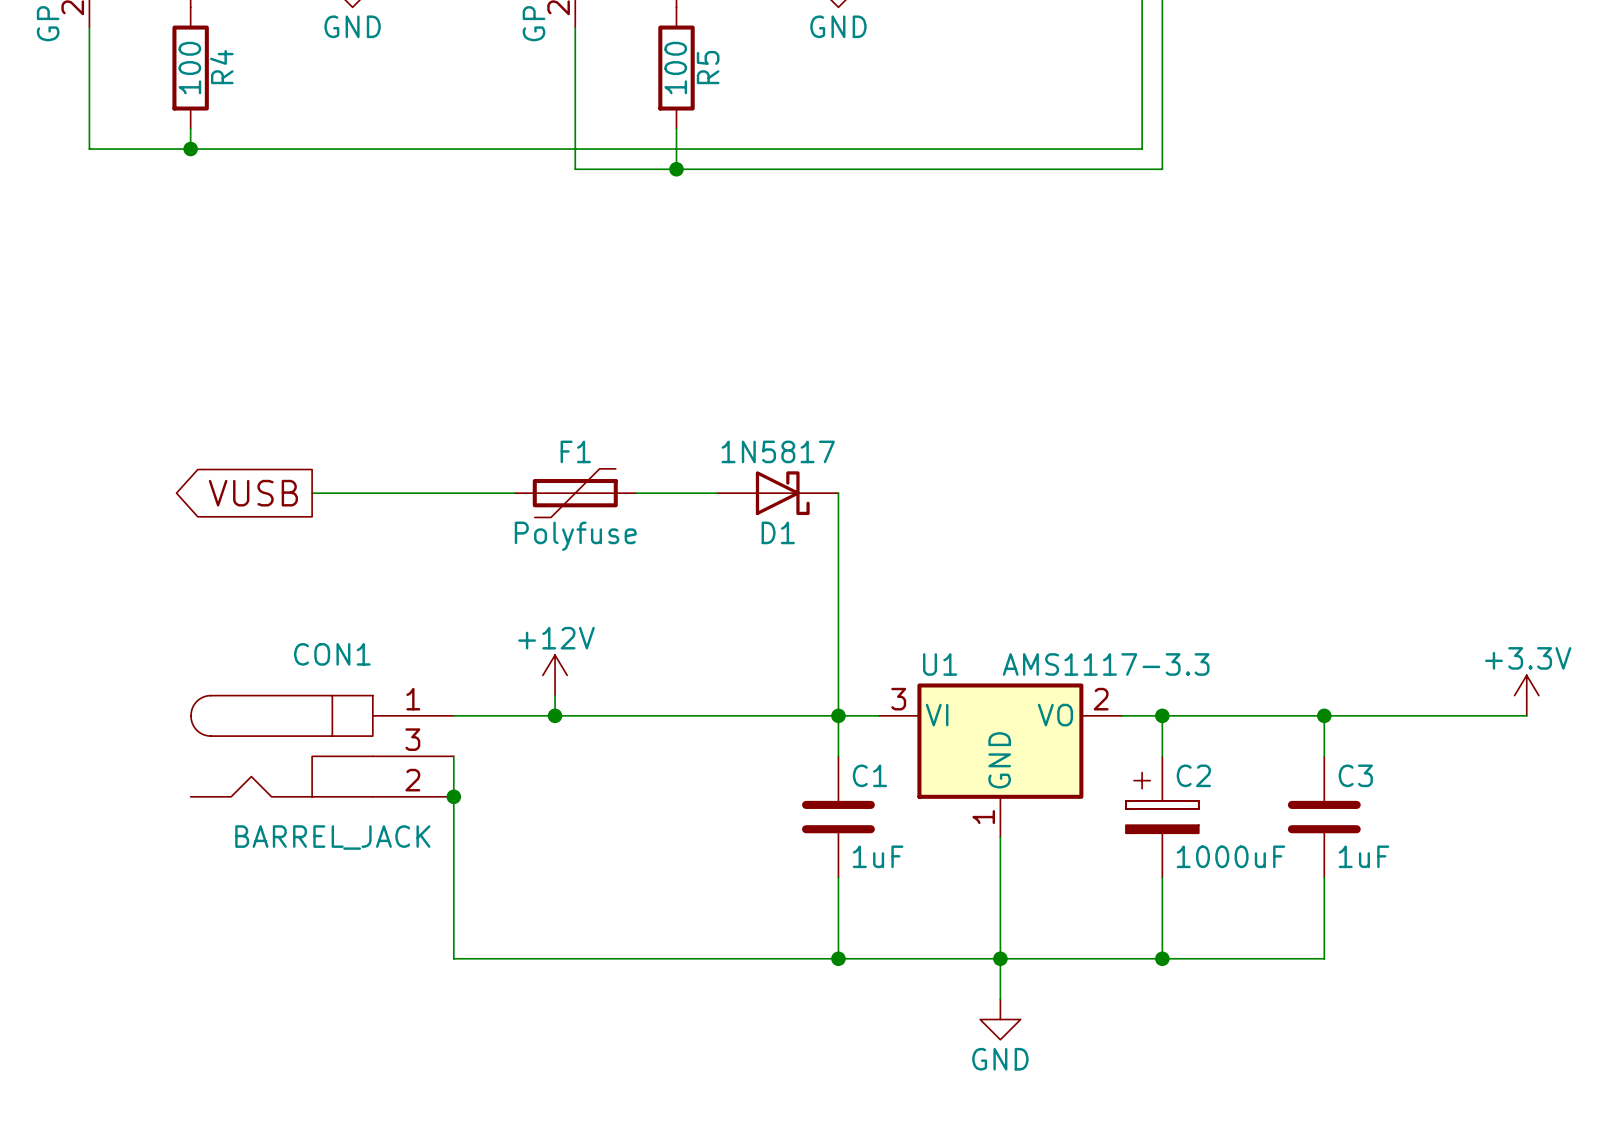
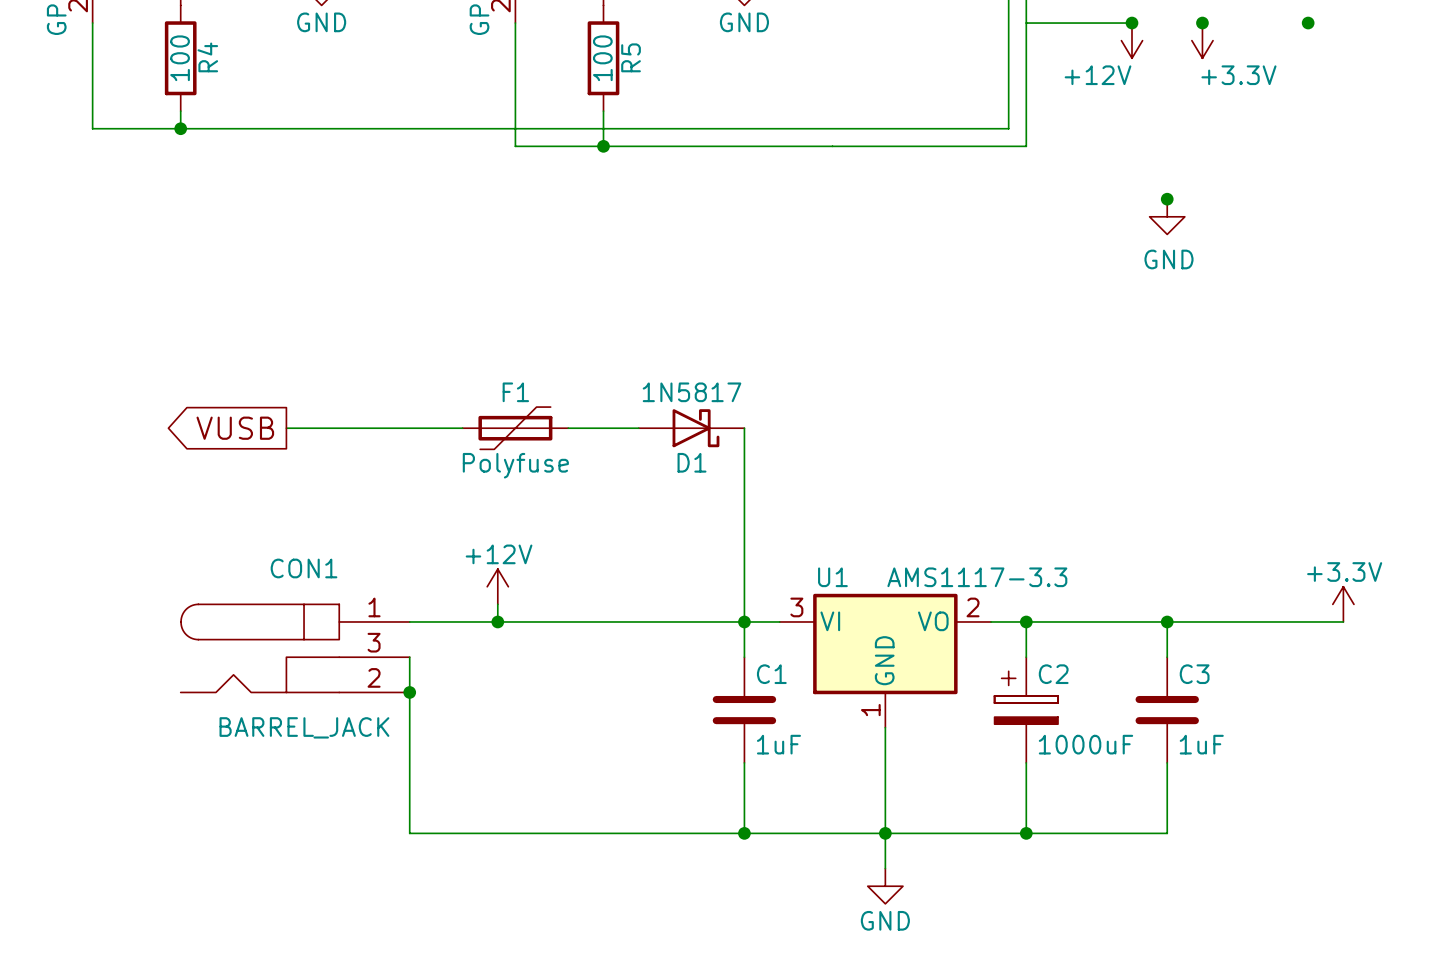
wire: none -> (1026, 23) (1131, 23)
junction: none -> (1131, 23)
junction: none -> (1202, 23)
junction: none -> (1308, 23)
power symbol: none -> +12V (1131, 40)
power symbol: none -> +3.3V (1202, 40)
junction: none -> (1167, 199)
power symbol: none -> GND (1167, 216)

